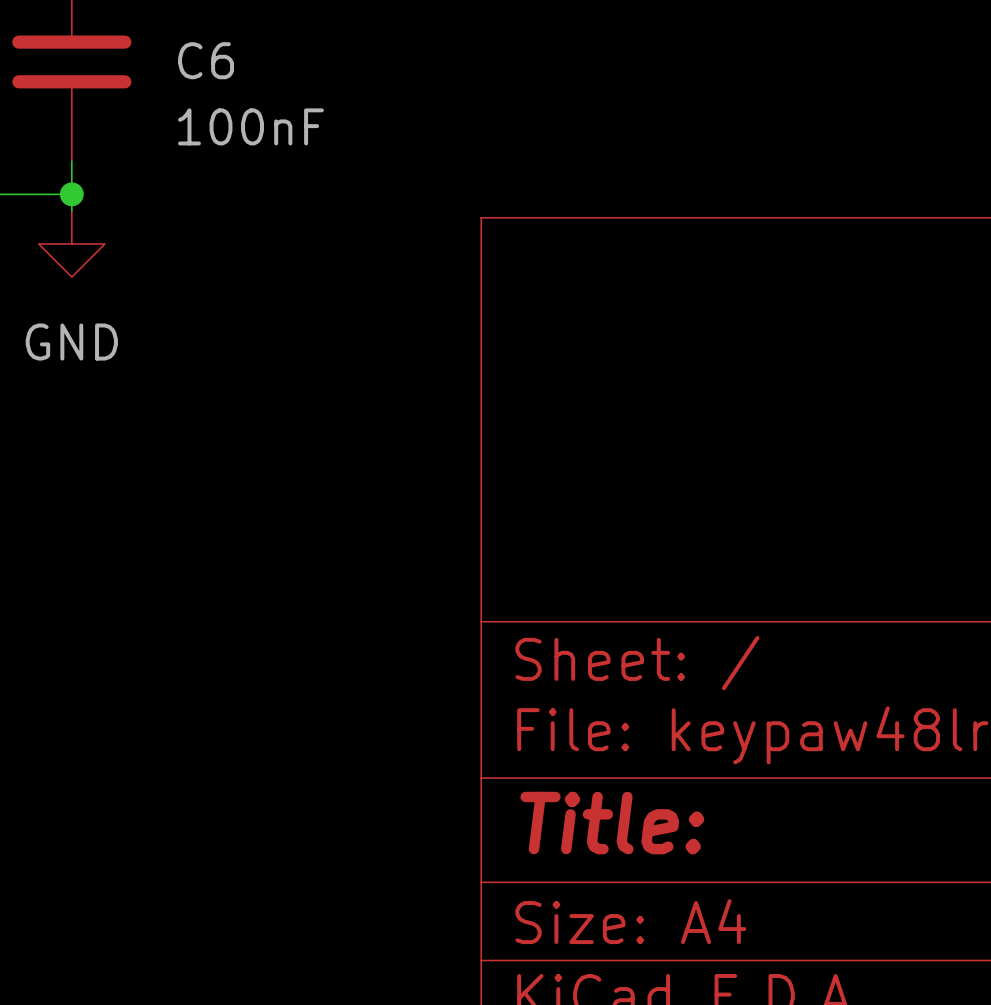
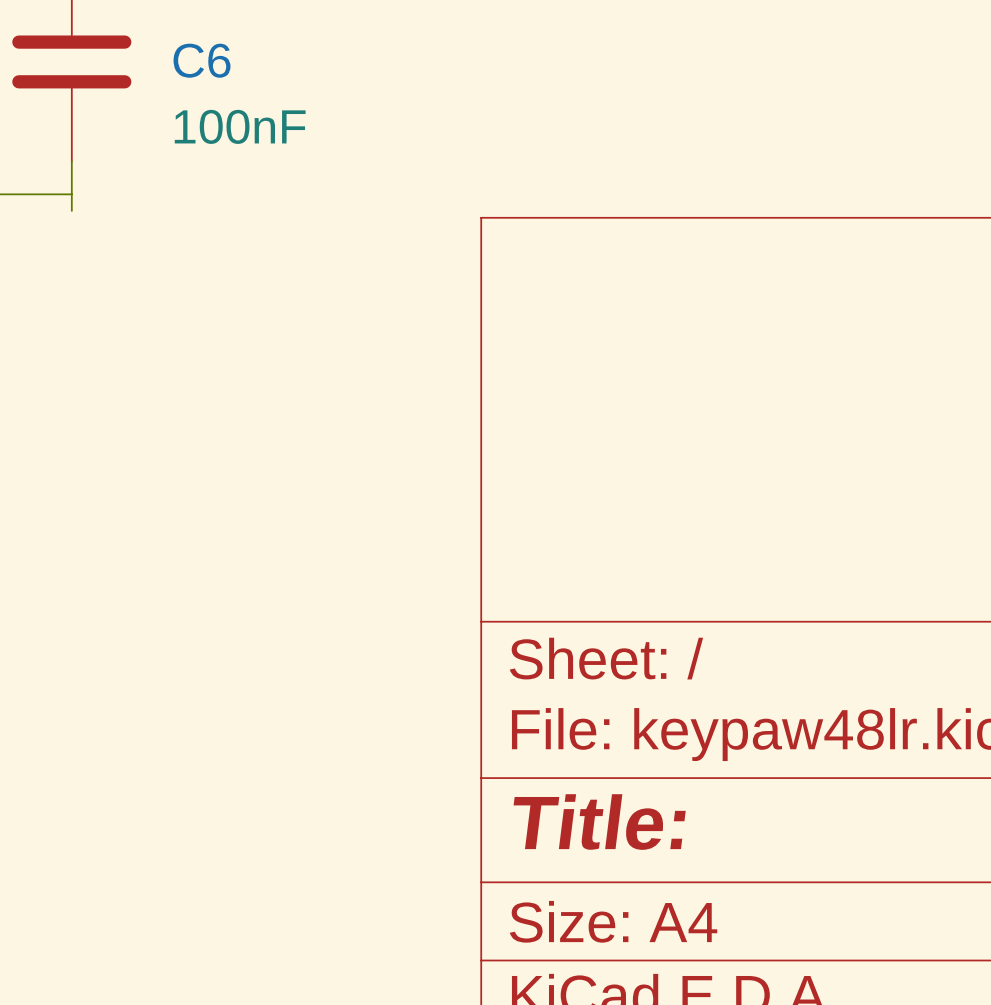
junction: (71, 194) -> none
power symbol: GND (71, 243) -> none

